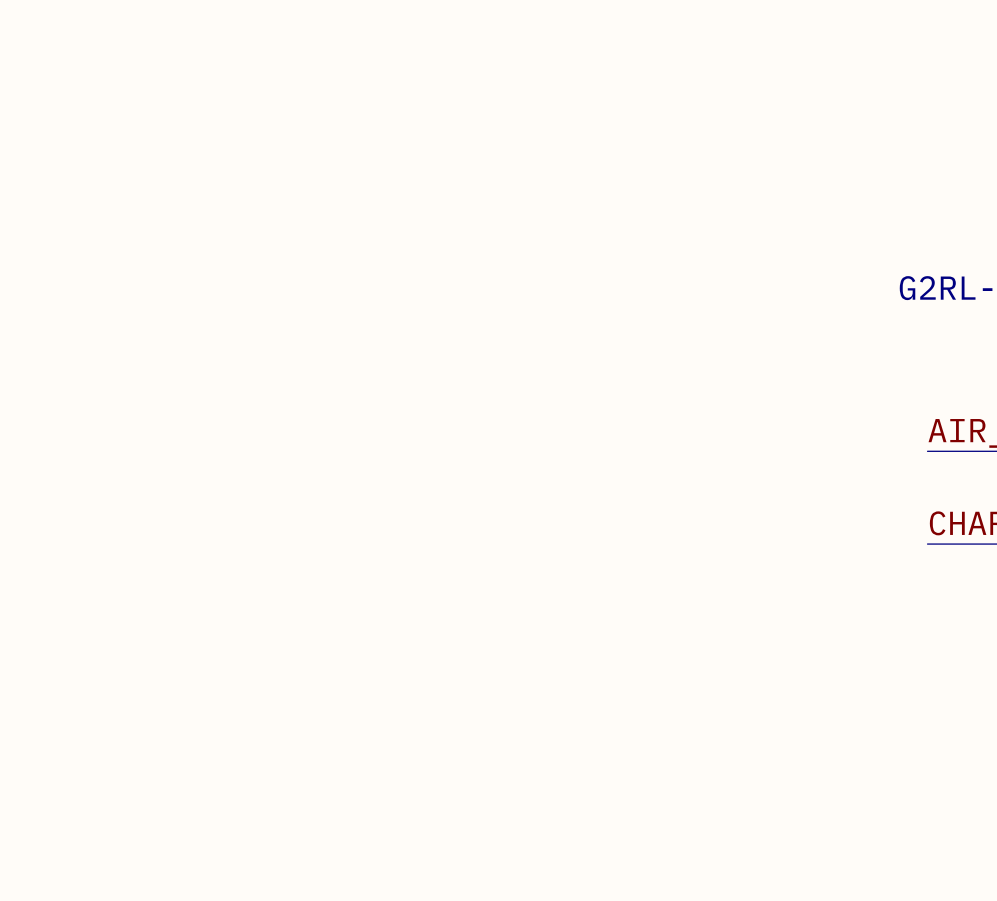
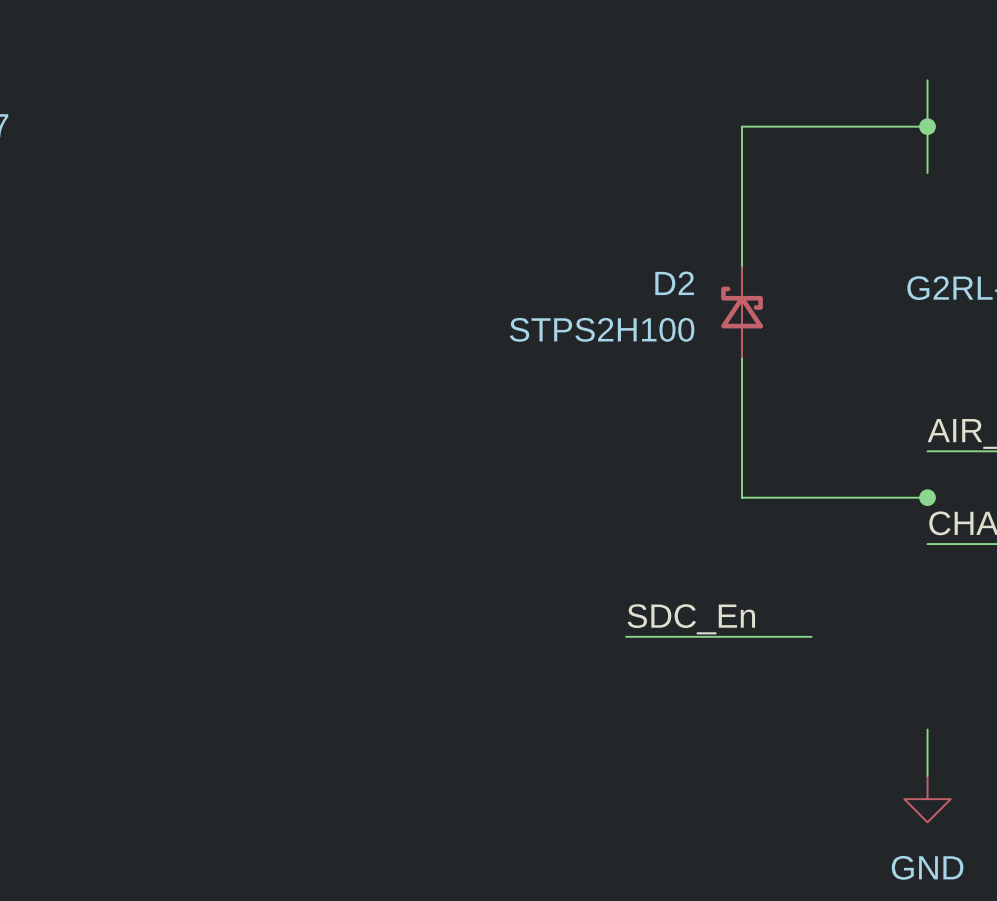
wire: none -> (927, 80) (927, 173)
wire: none -> (927, 126) (742, 126) (742, 265)
junction: none -> (927, 126)
D2: none -> STPS2H100 (742, 312)
wire: none -> (742, 358) (742, 497) (927, 497)
junction: none -> (927, 497)
label: none -> SDC_En (691, 619)
wire: none -> (626, 636) (811, 636)
wire: none -> (927, 729) (927, 775)
power symbol: none -> GND (927, 799)

